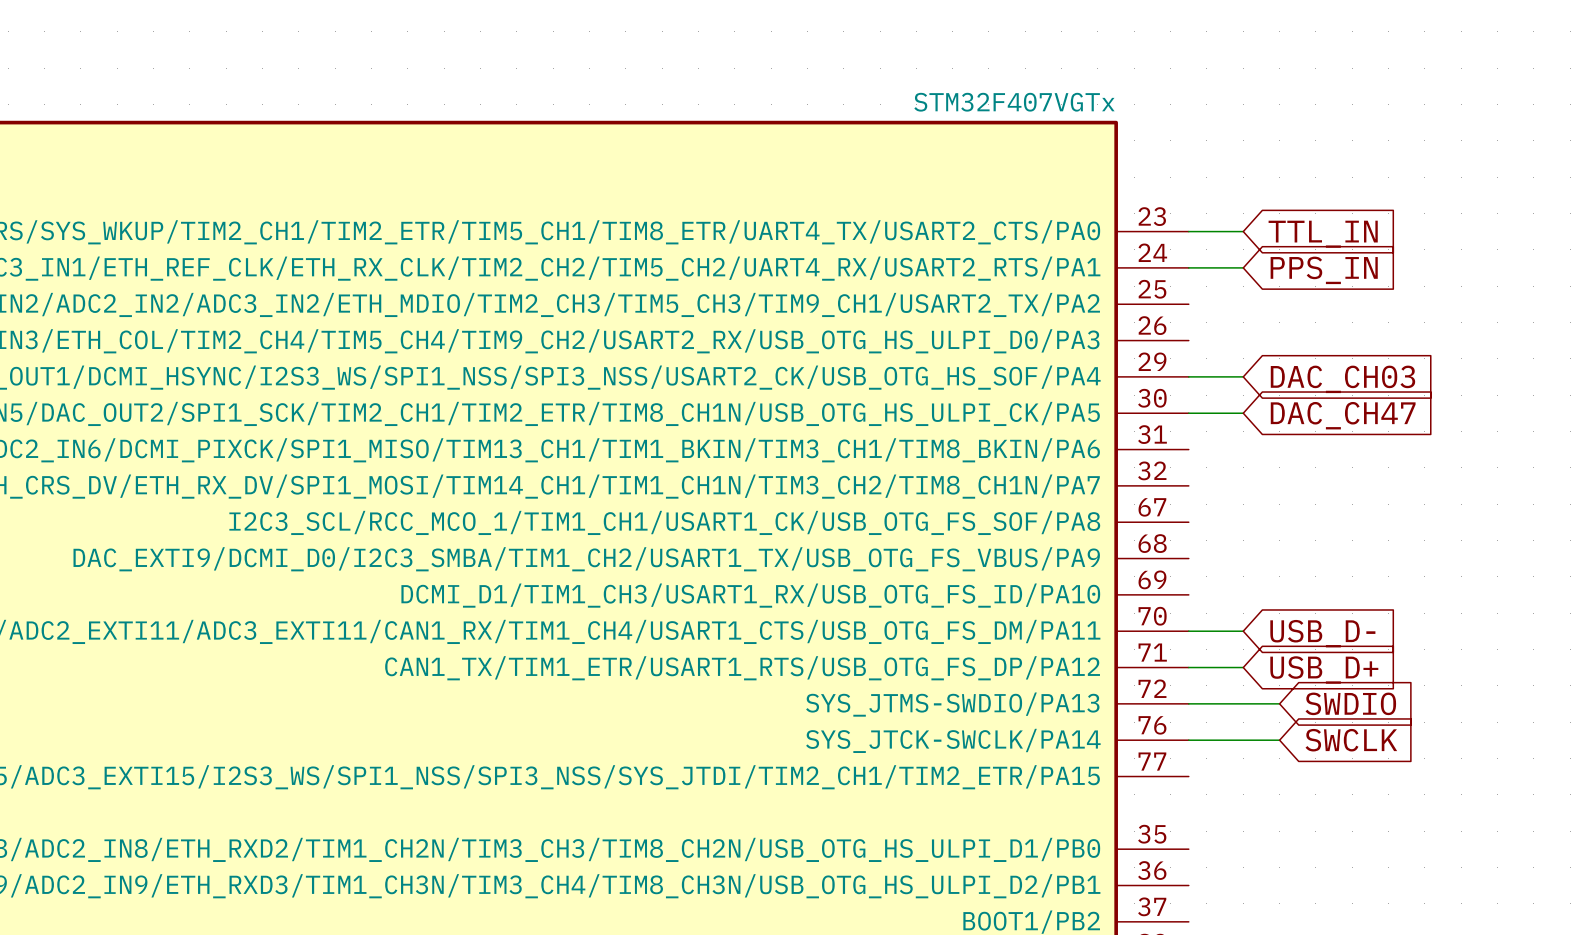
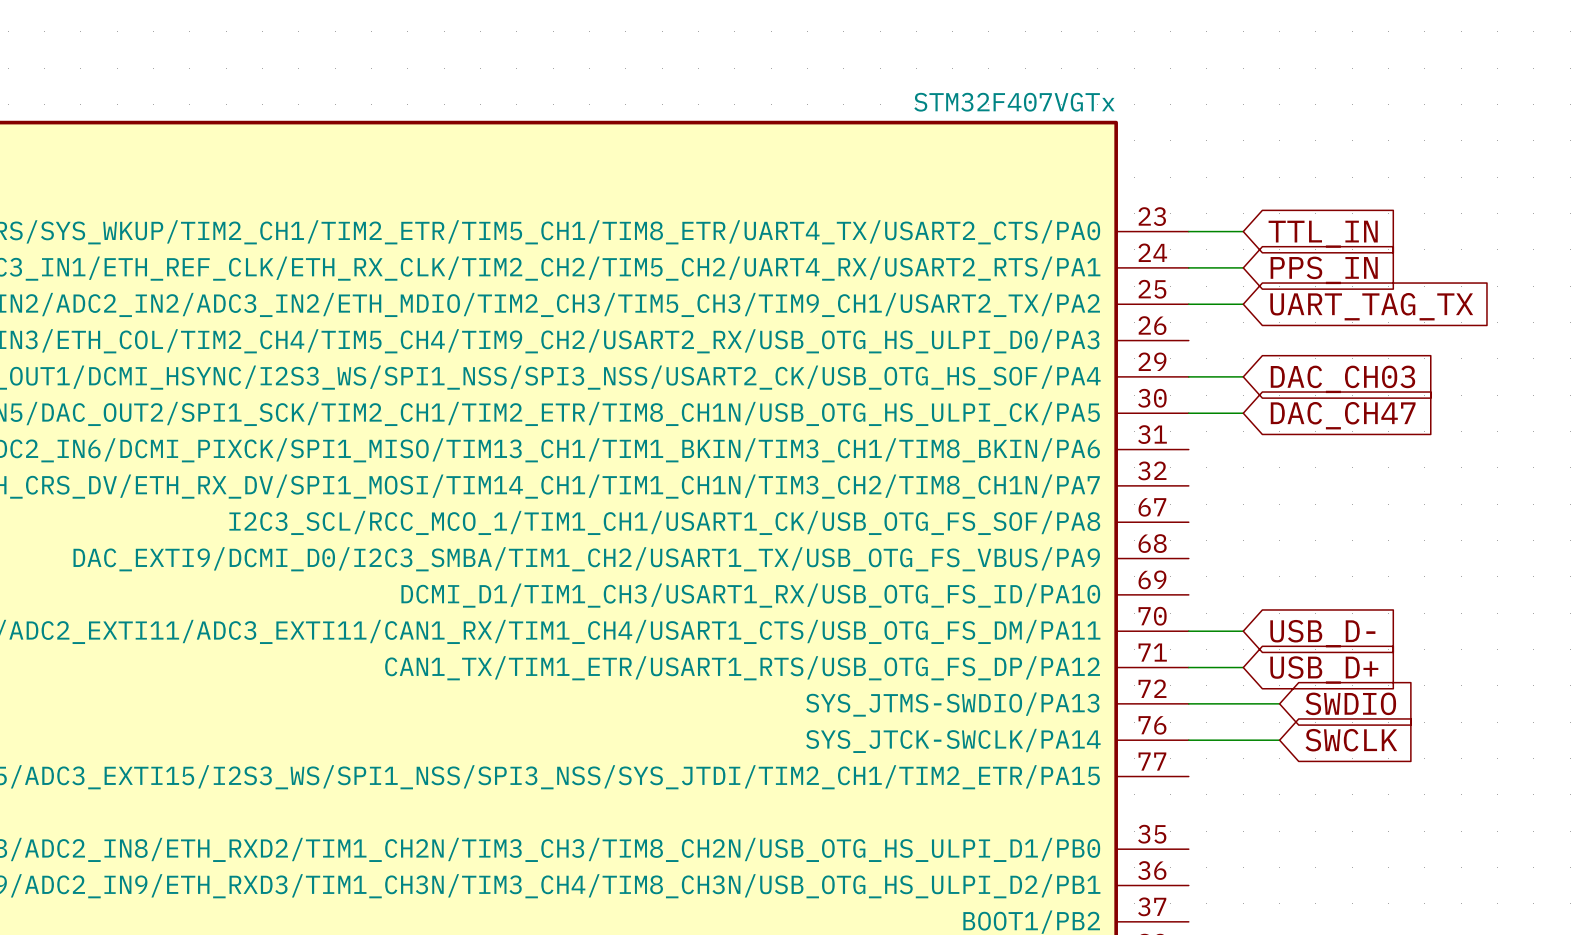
wire: none -> (1188, 304) (1243, 304)
global label: none -> UART_TAG_TX (1371, 306)

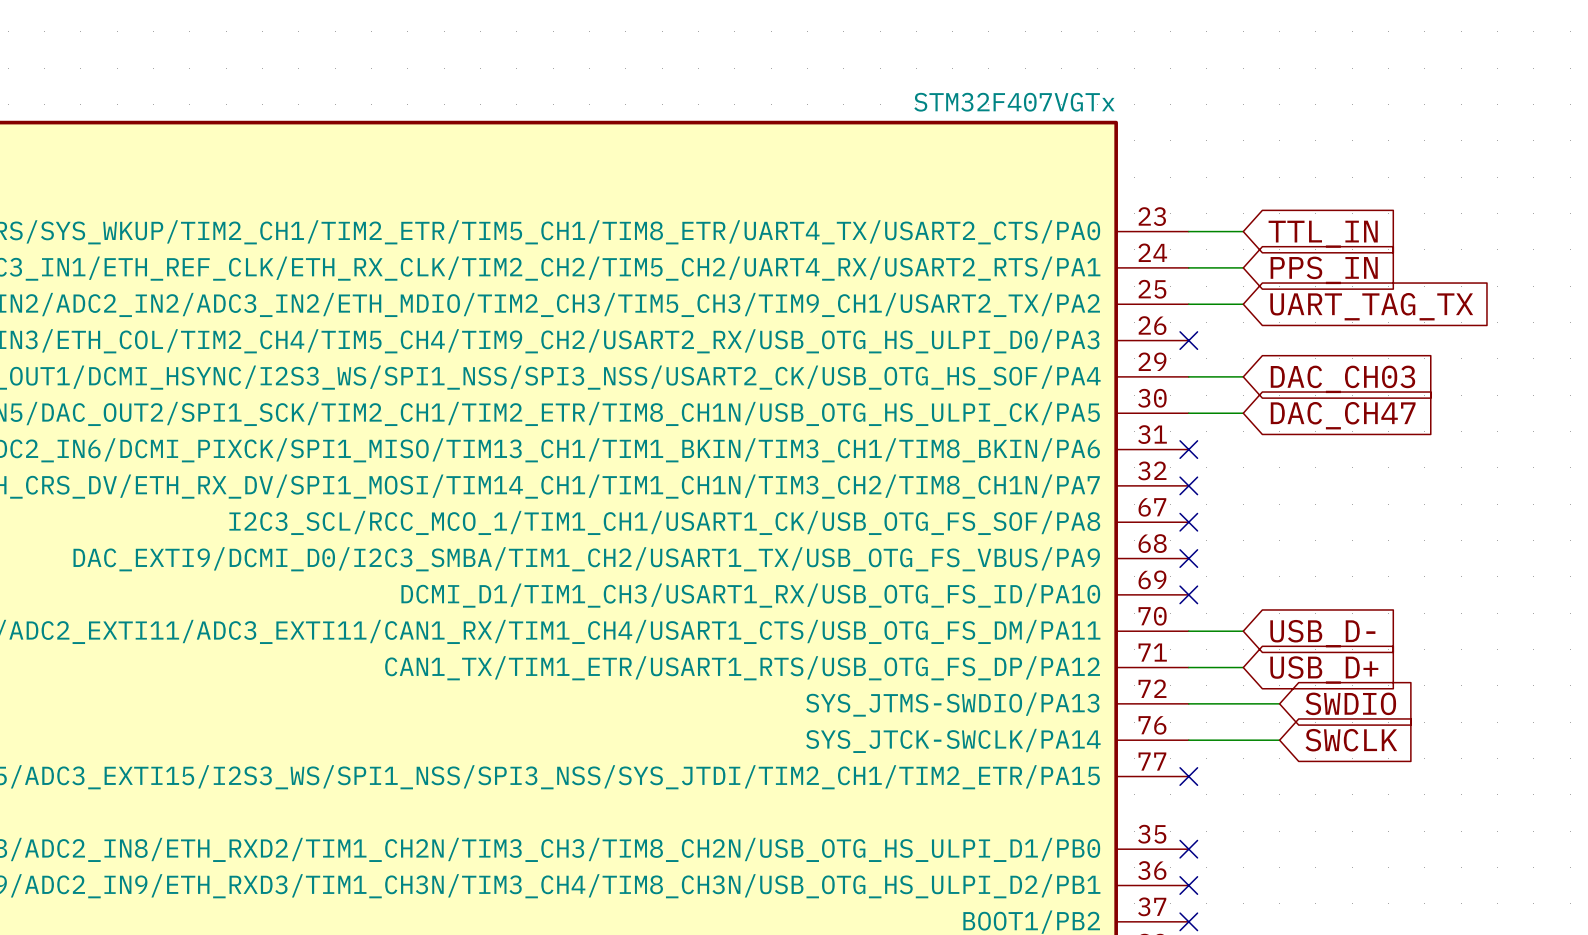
no-connect mark: none -> (1188, 340)
no-connect mark: none -> (1188, 449)
no-connect mark: none -> (1188, 485)
no-connect mark: none -> (1188, 522)
no-connect mark: none -> (1188, 558)
no-connect mark: none -> (1188, 594)
no-connect mark: none -> (1188, 776)
no-connect mark: none -> (1188, 849)
no-connect mark: none -> (1188, 885)
no-connect mark: none -> (1188, 921)

